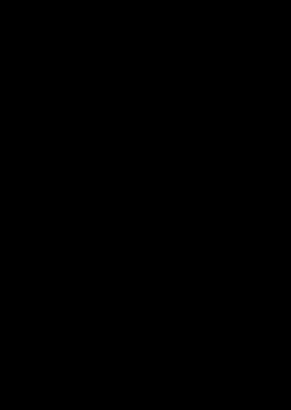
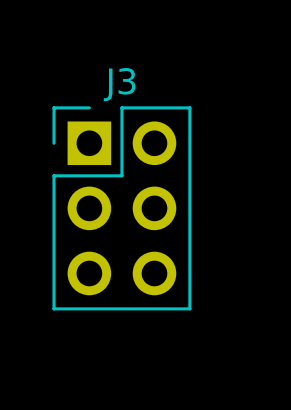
J3: none -> (121, 208)

